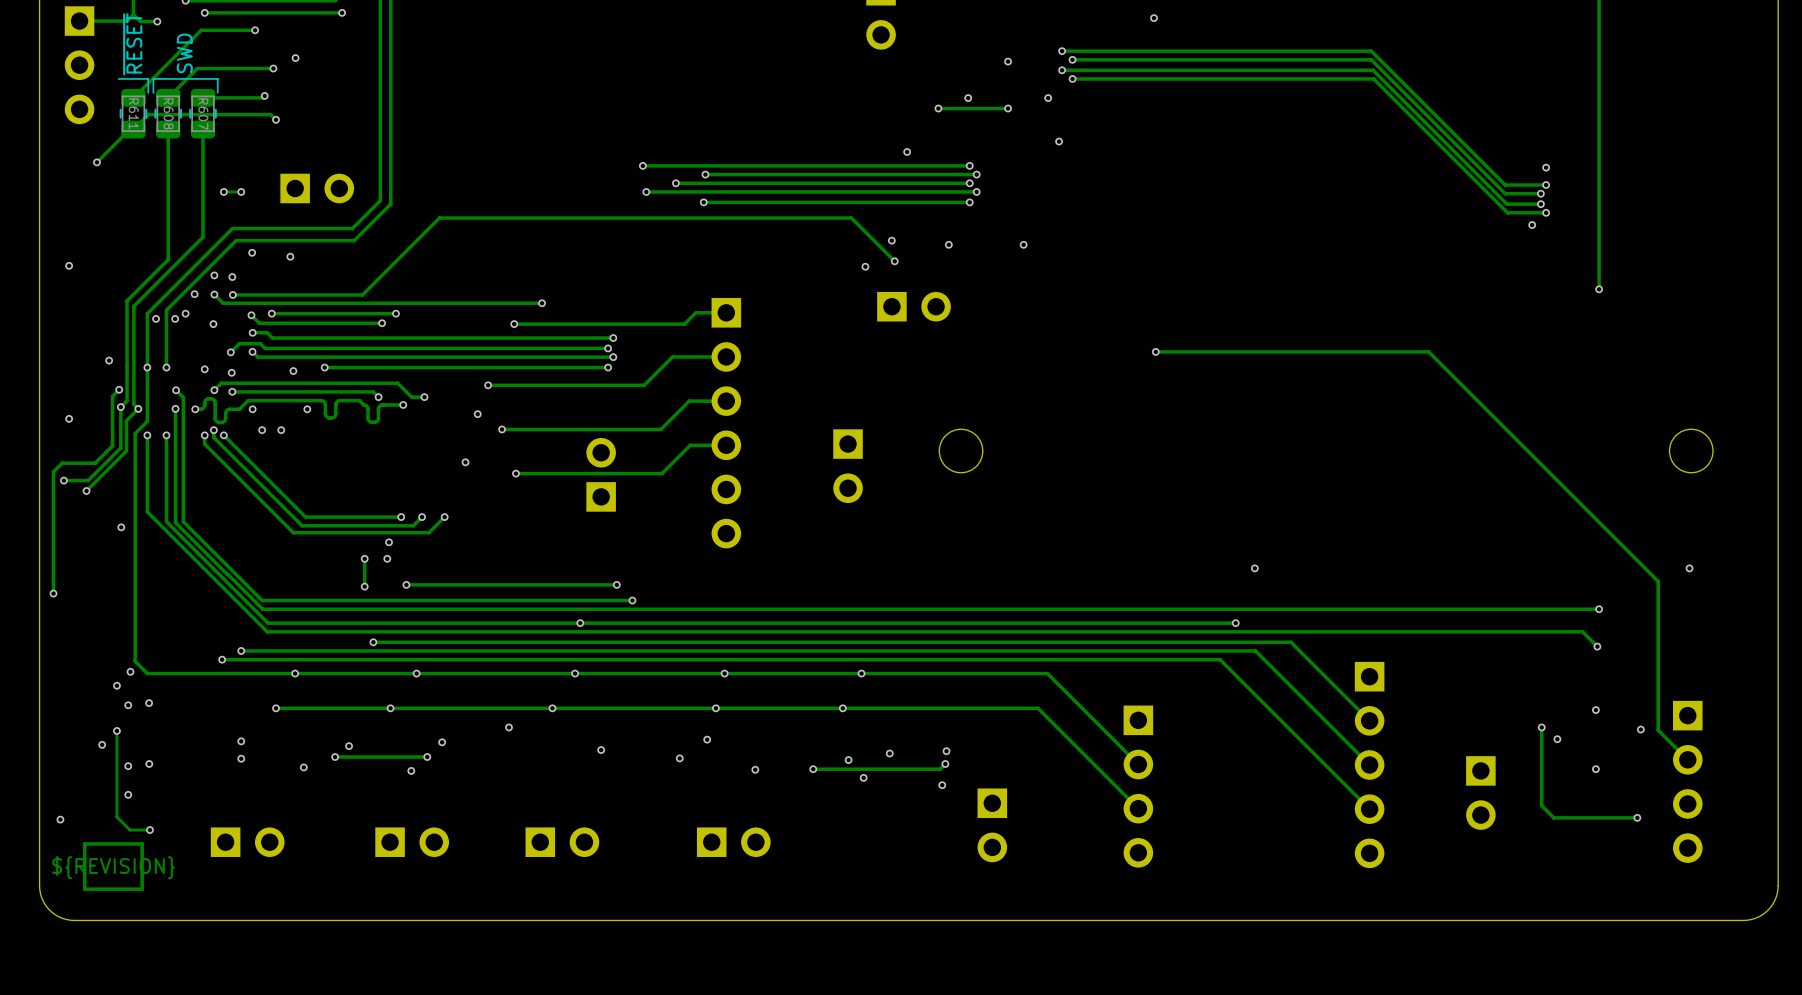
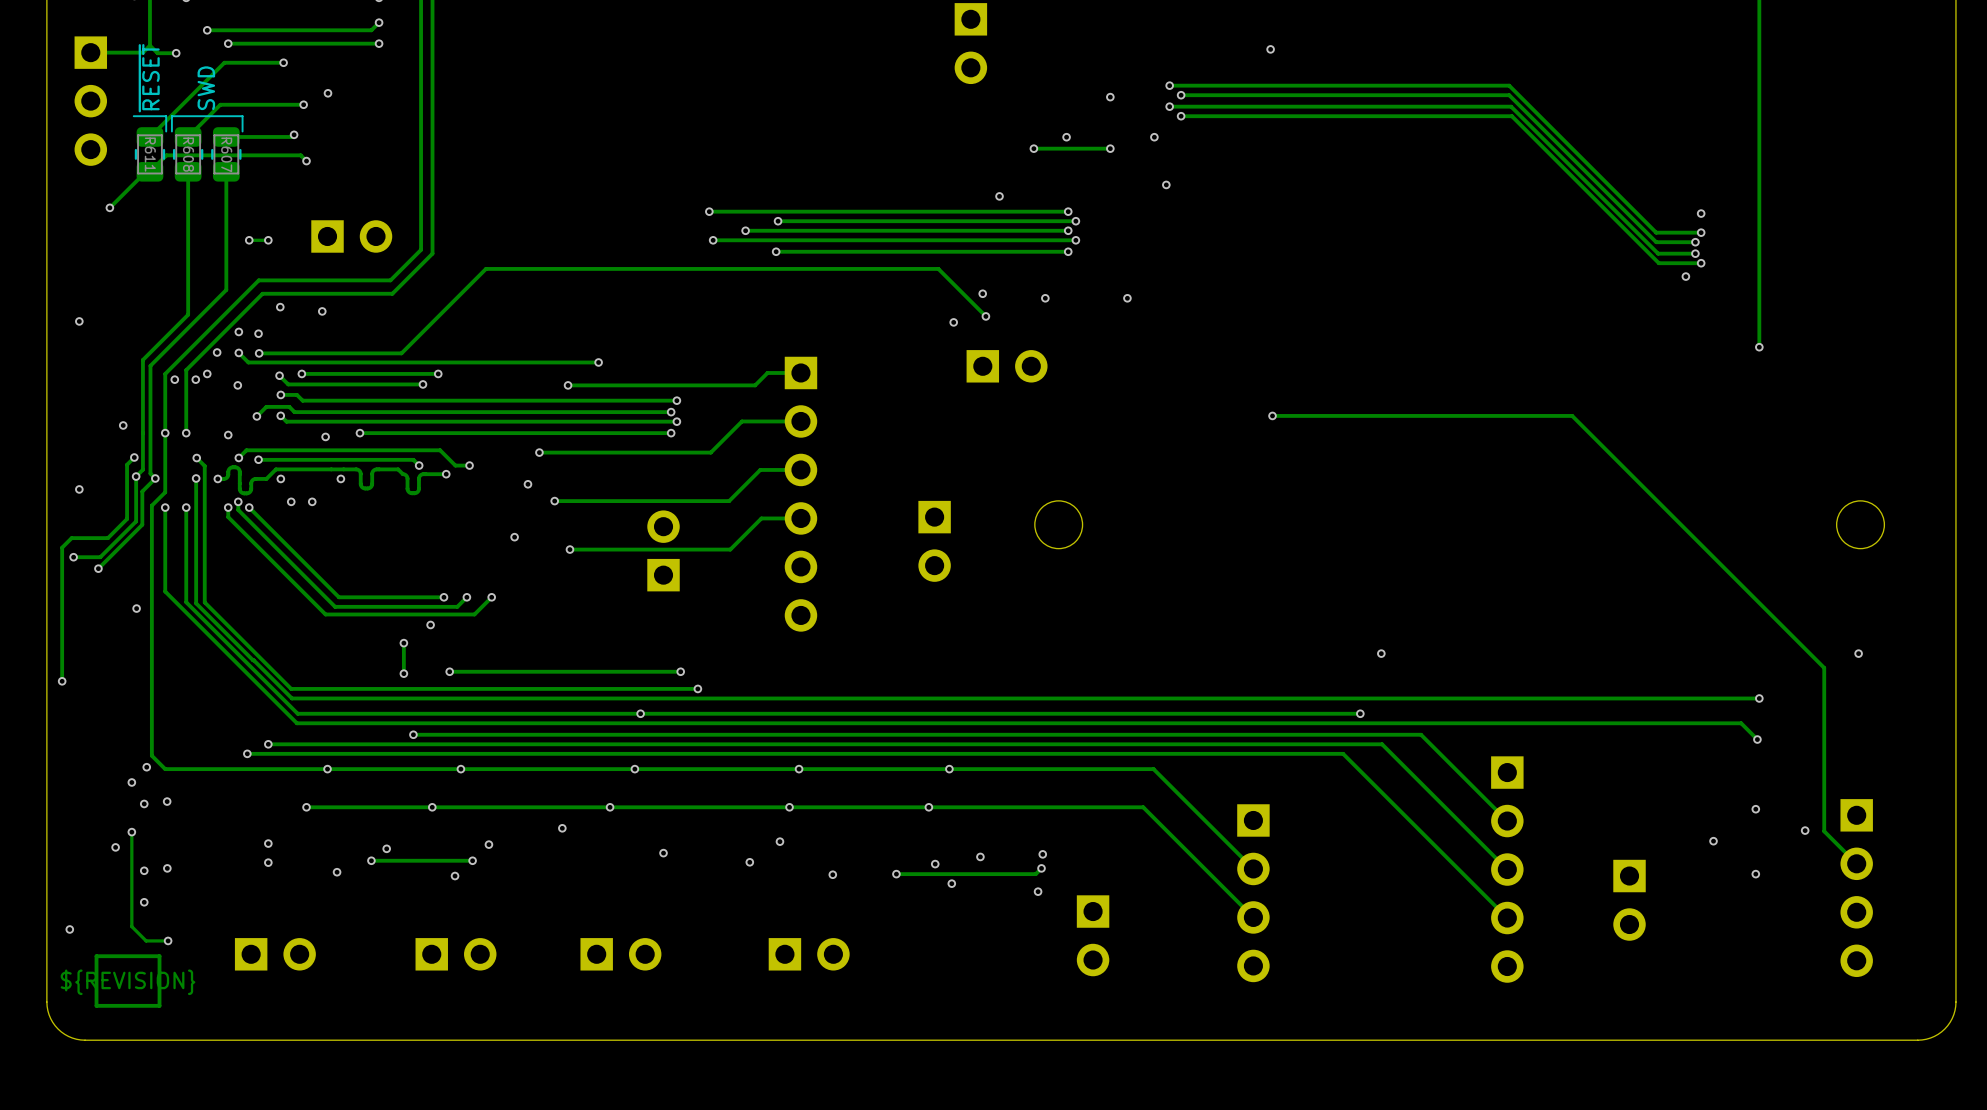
via: (231, 372) -> none
via: (387, 558) -> none
track: (1541, 727) (1541, 805) (1553, 817) (1637, 817) -> none
via: (1541, 727) -> none
via: (1637, 817) -> none

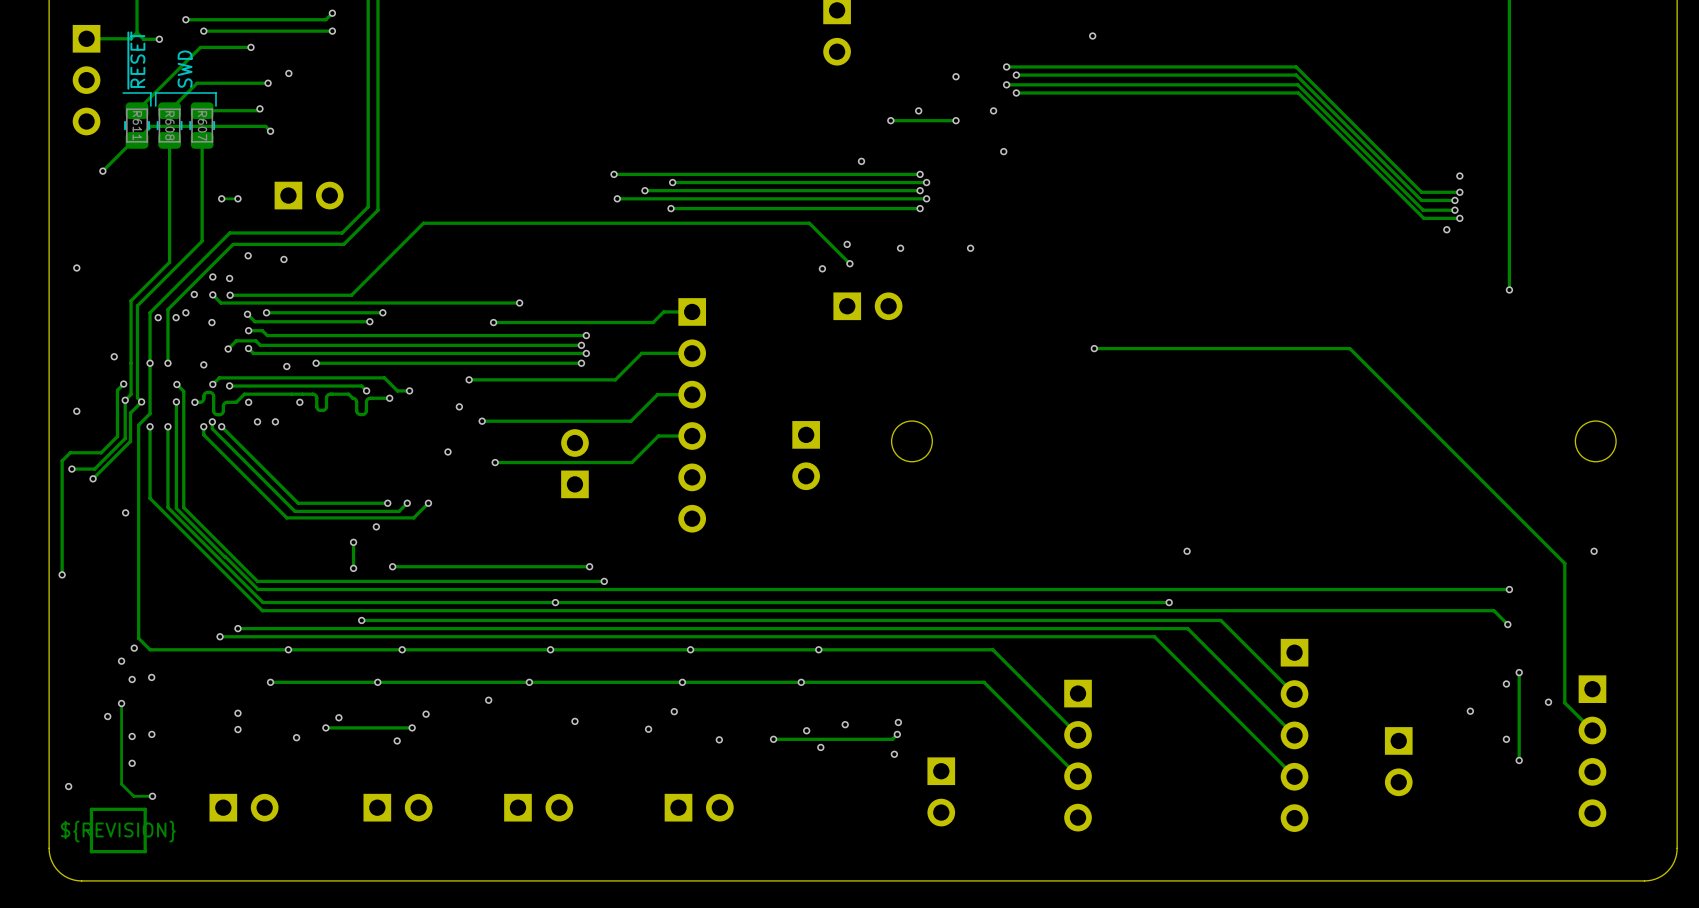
track: none -> (1519, 672) (1519, 760)
via: none -> (1519, 672)
via: none -> (1519, 760)

